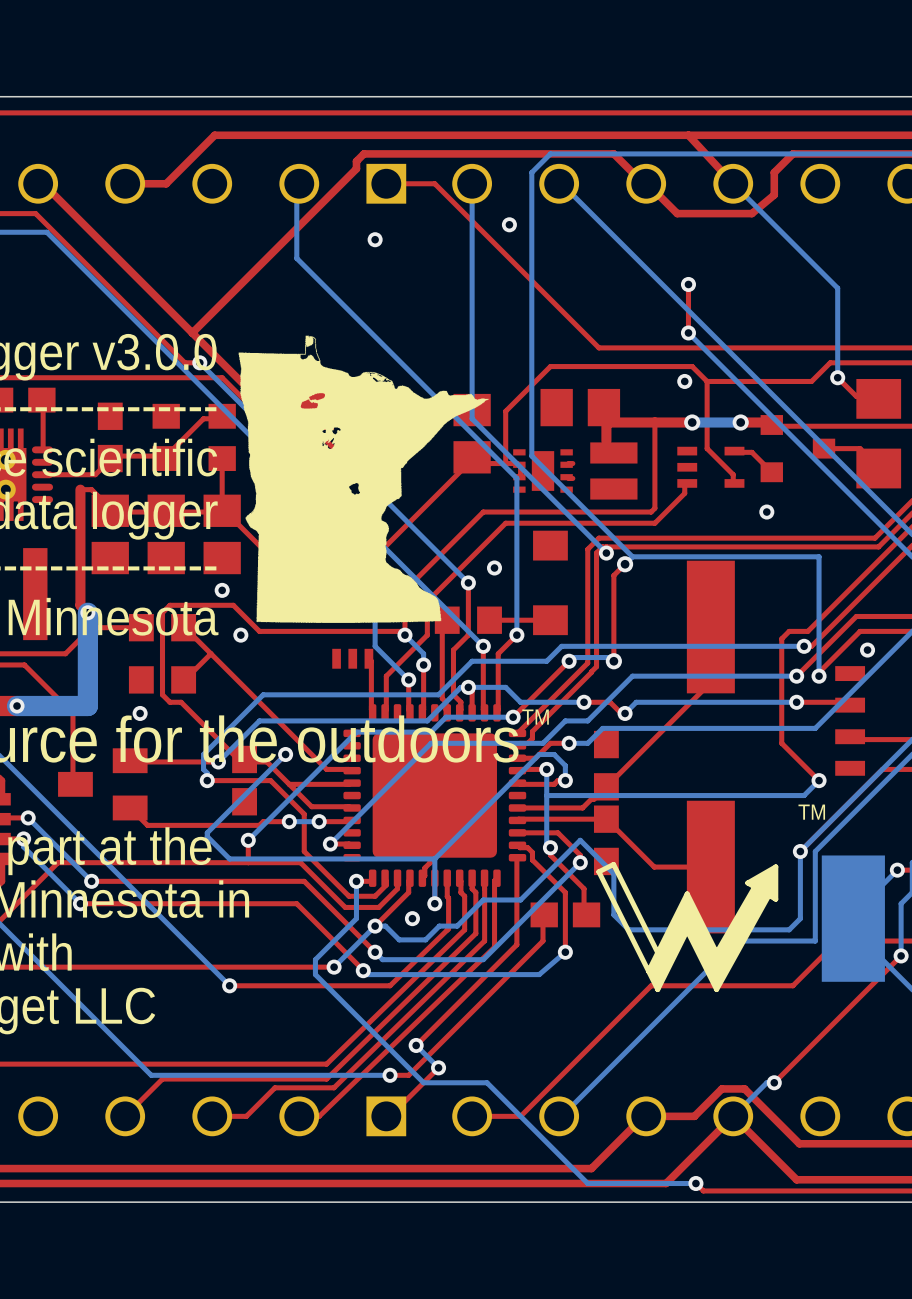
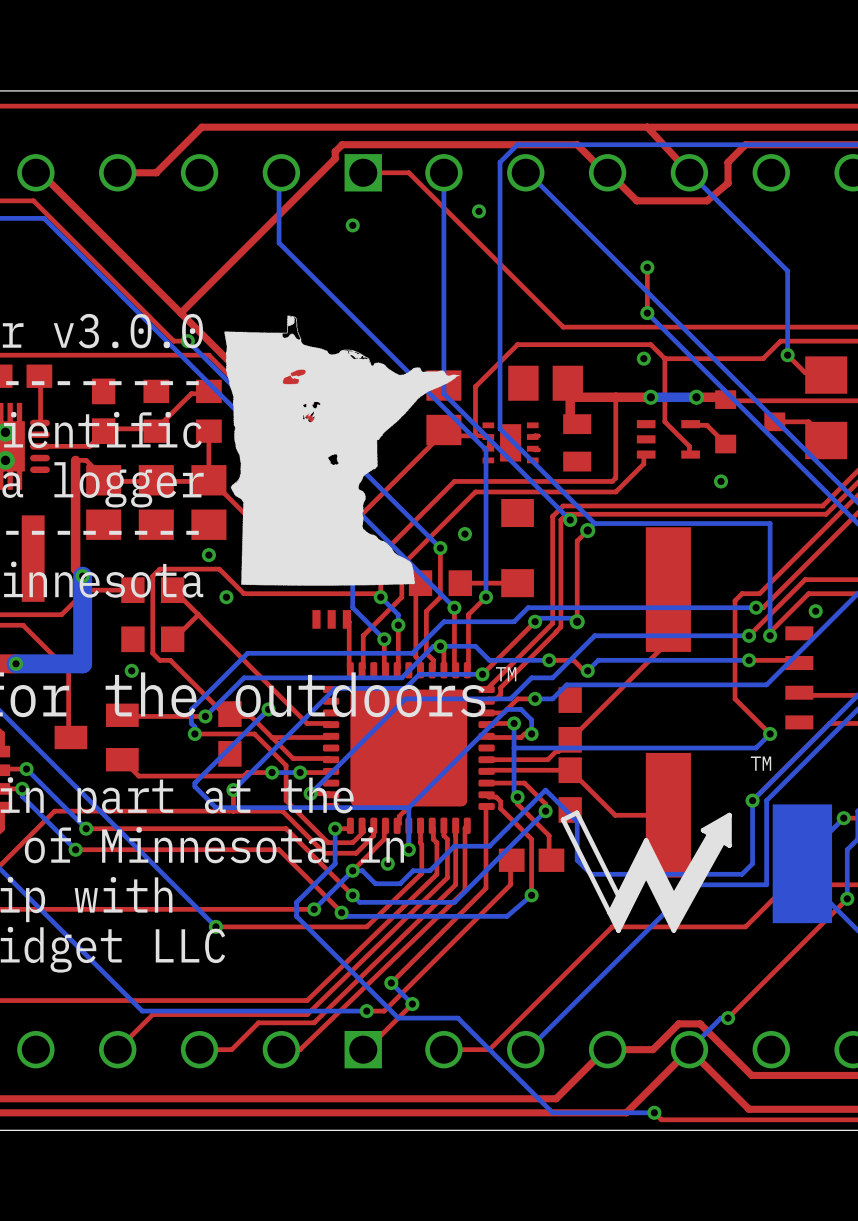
part footprint: [590, 442, 638, 500] -> [563, 414, 592, 472]

